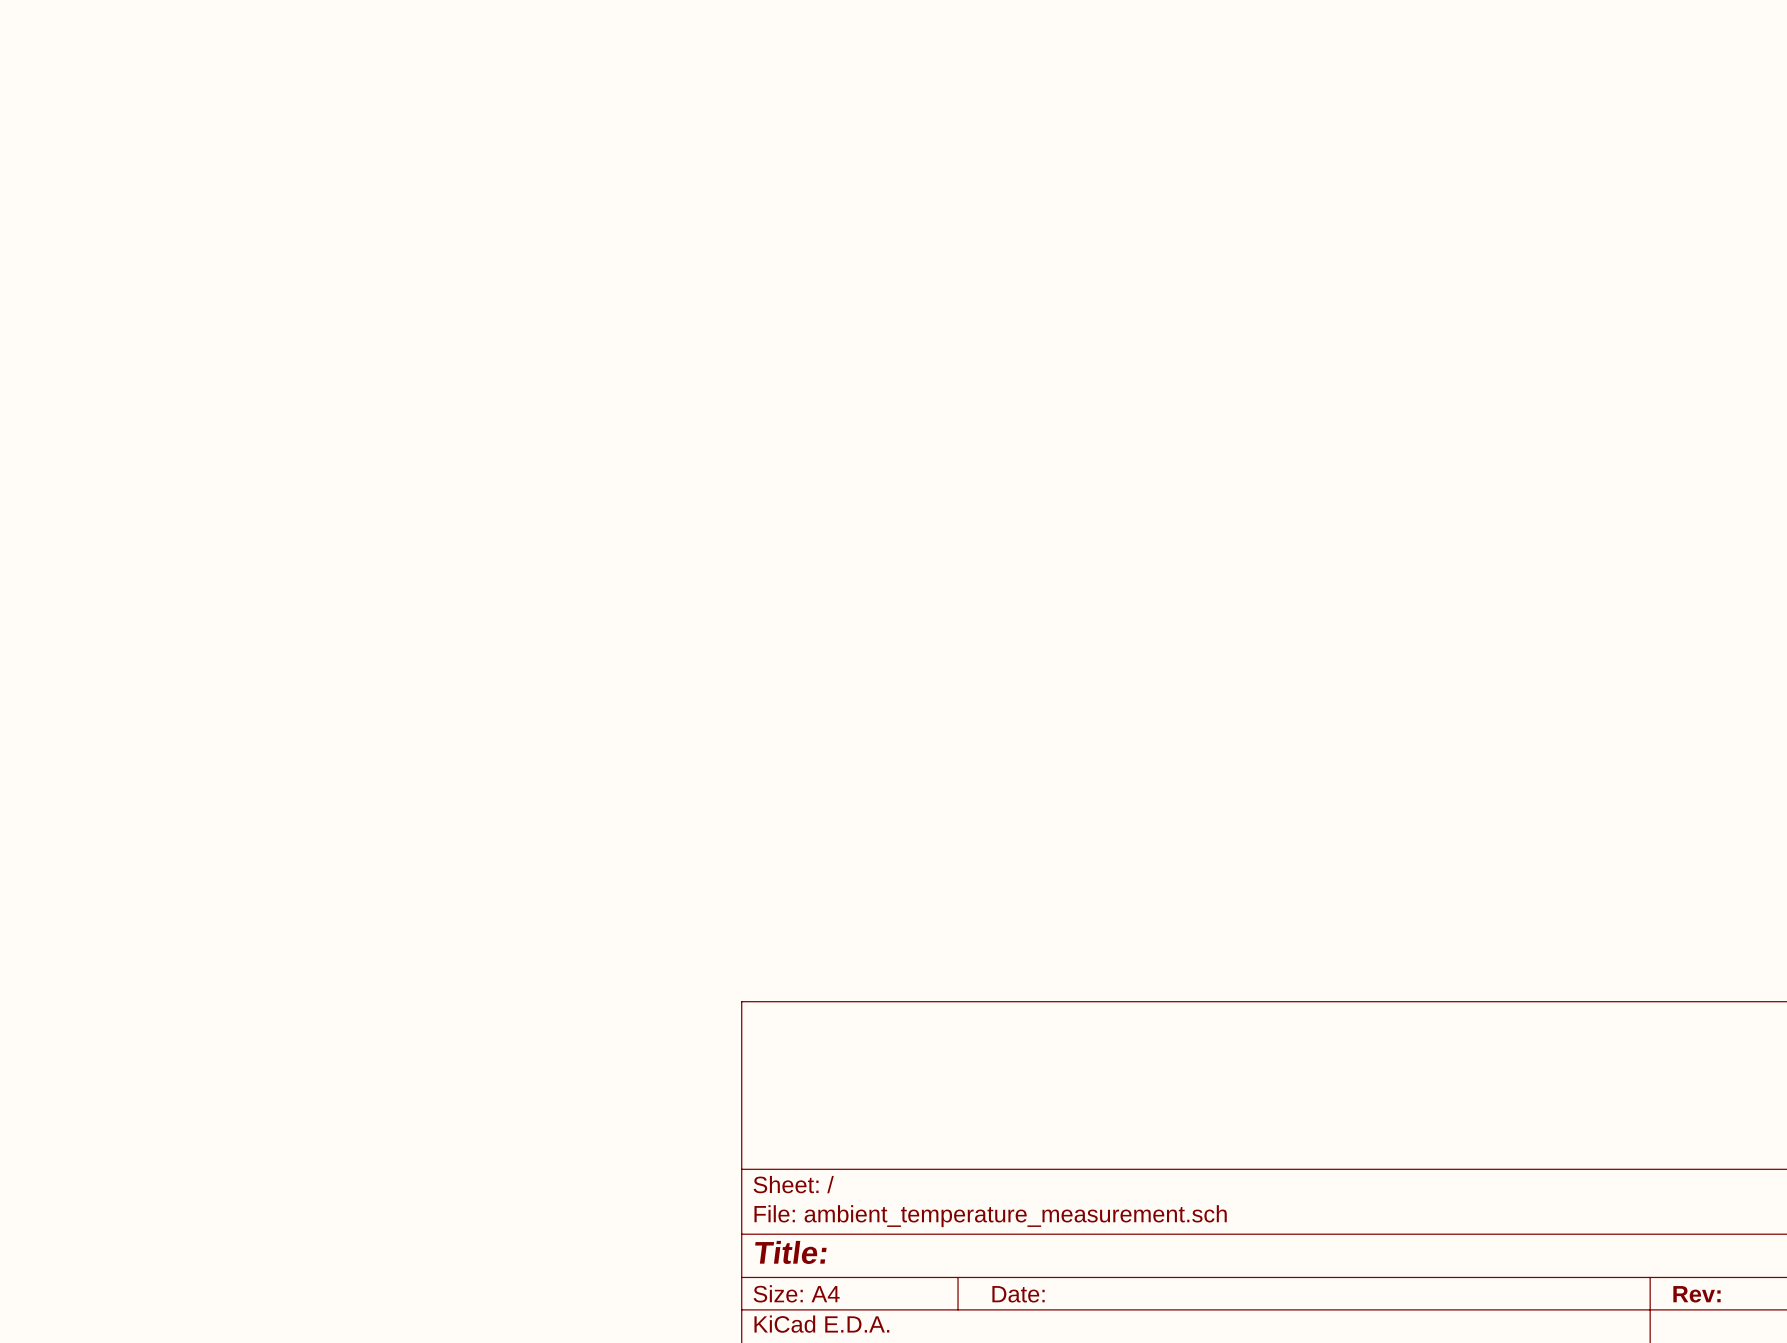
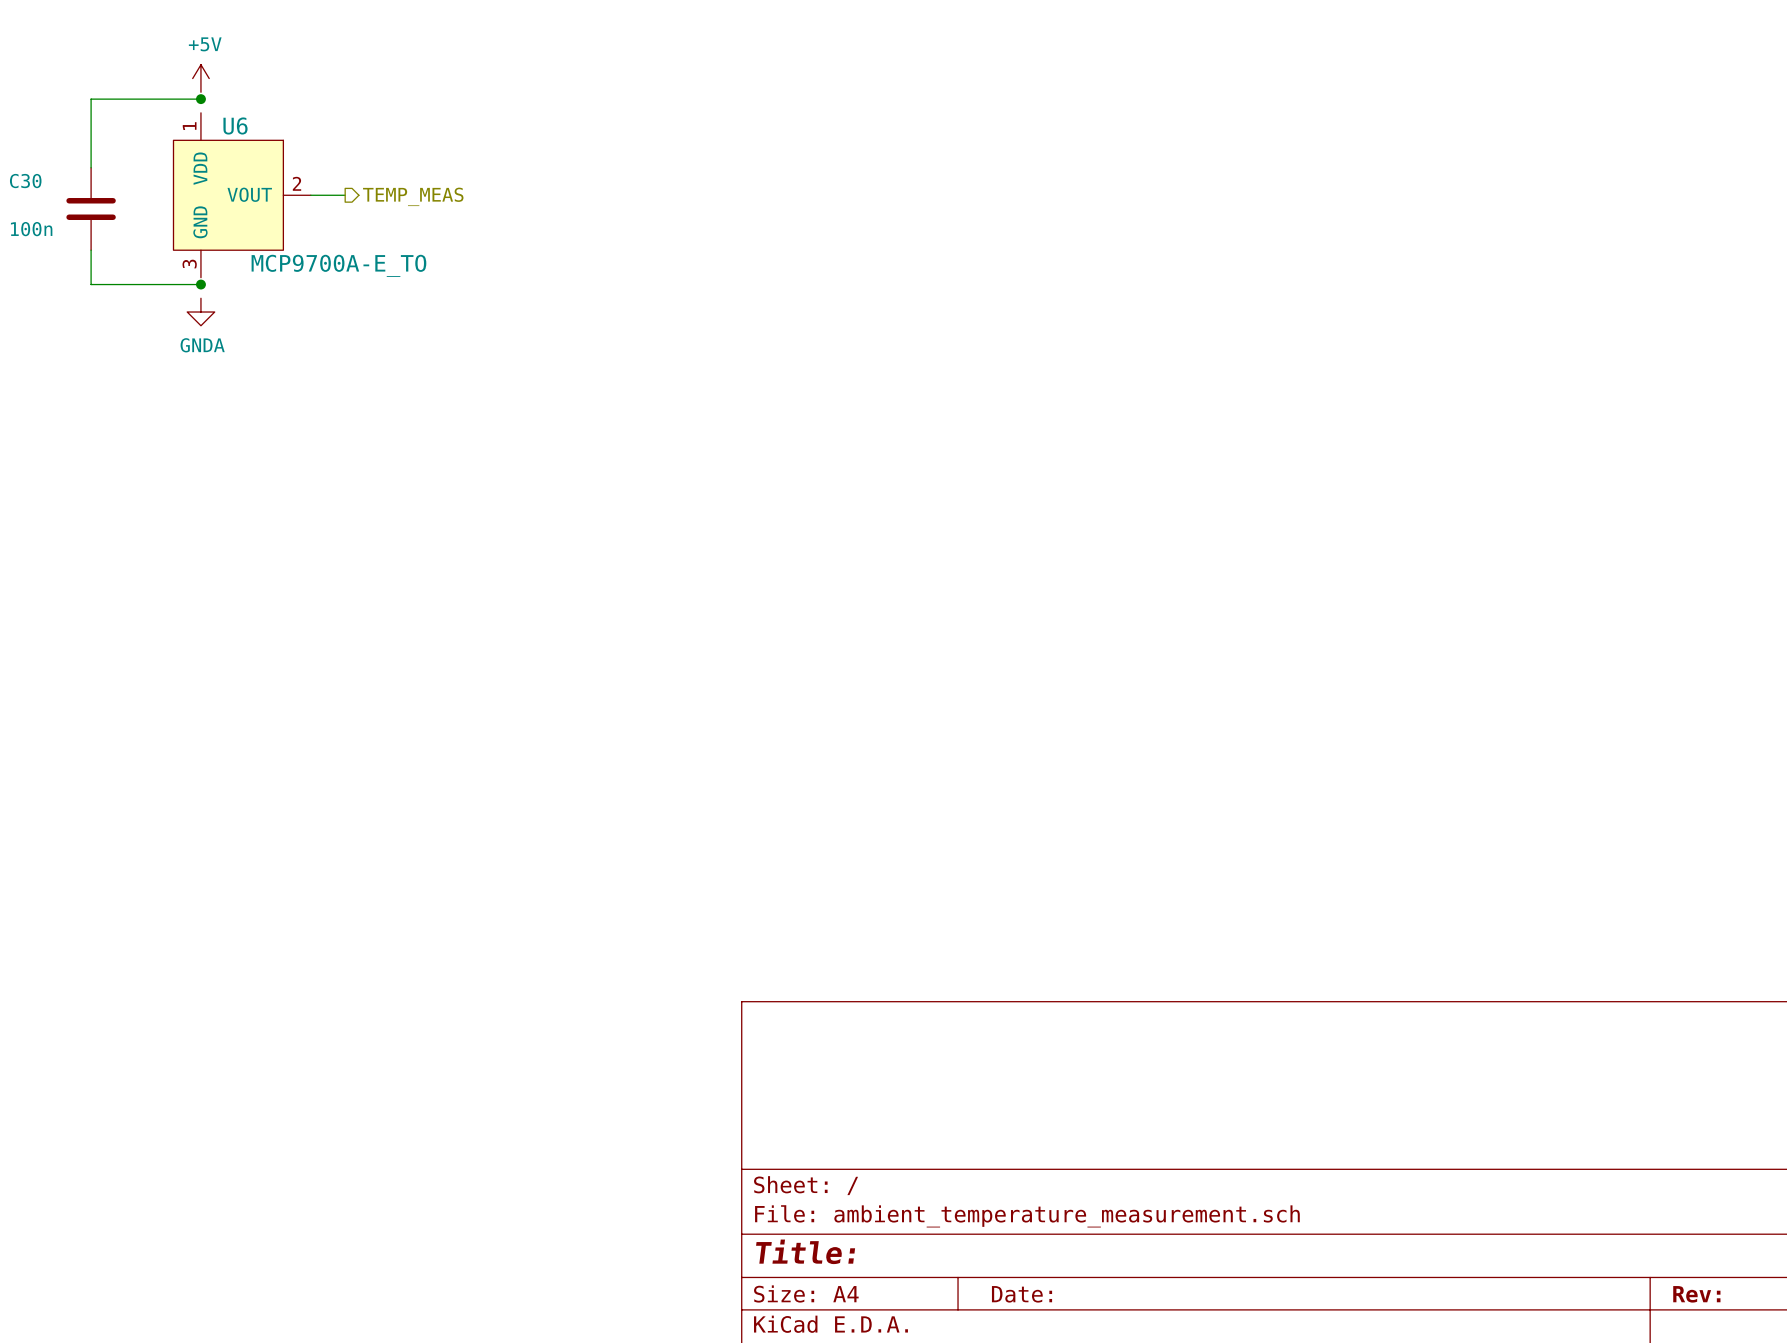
power symbol: none -> +5V (200, 78)
wire: none -> (200, 99) (91, 99) (91, 167)
junction: none -> (200, 99)
U6: none -> MCP9700A-E_TO (242, 195)
wire: none -> (310, 195) (345, 195)
hierarchical label: none -> TEMP_MEAS (413, 196)
C30: none -> 100n (91, 209)
wire: none -> (91, 250) (91, 284) (200, 284)
junction: none -> (200, 284)
power symbol: none -> GNDA (200, 312)

